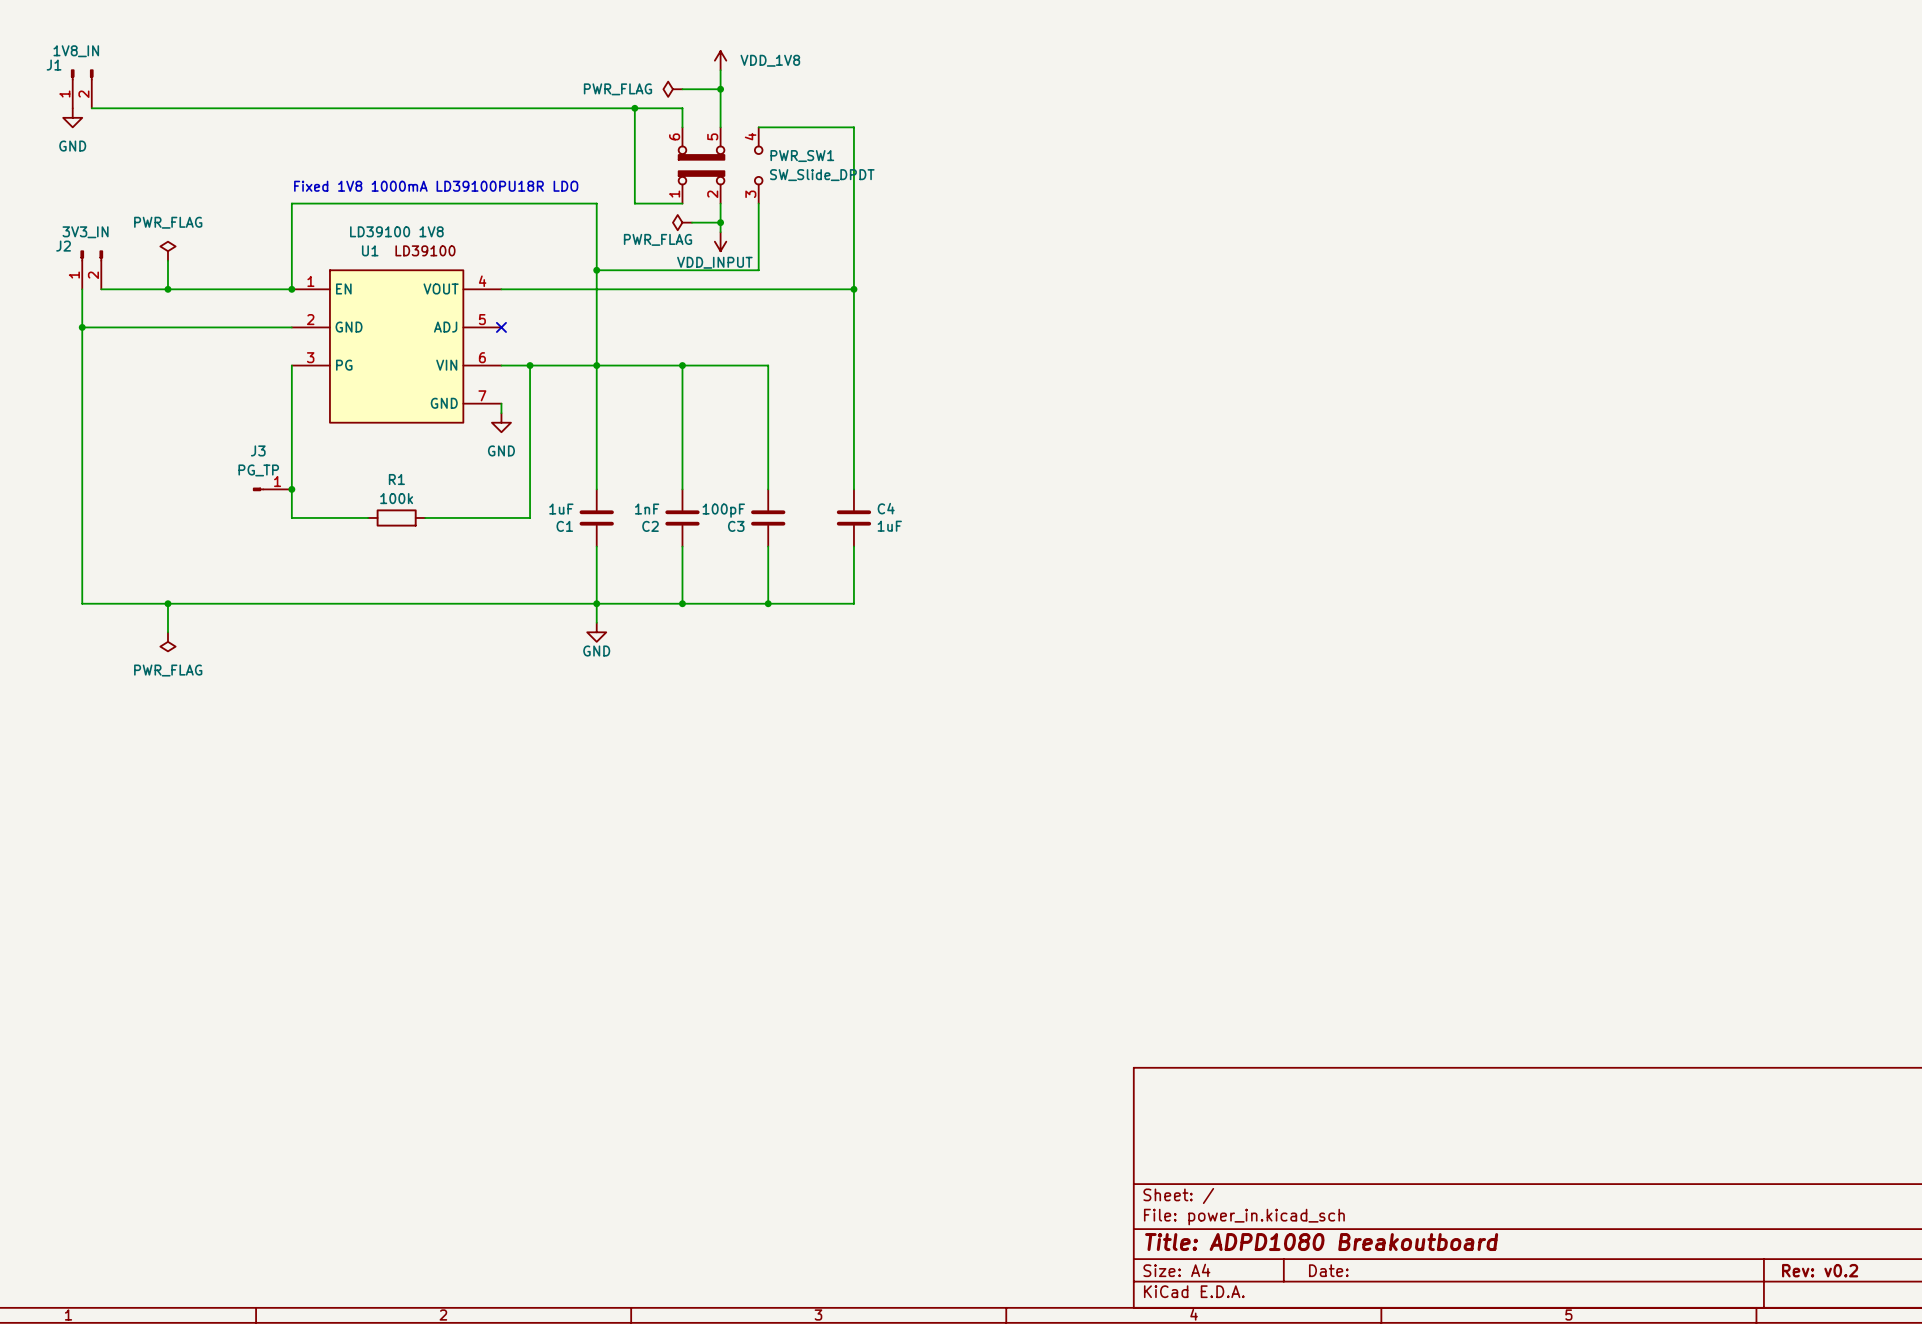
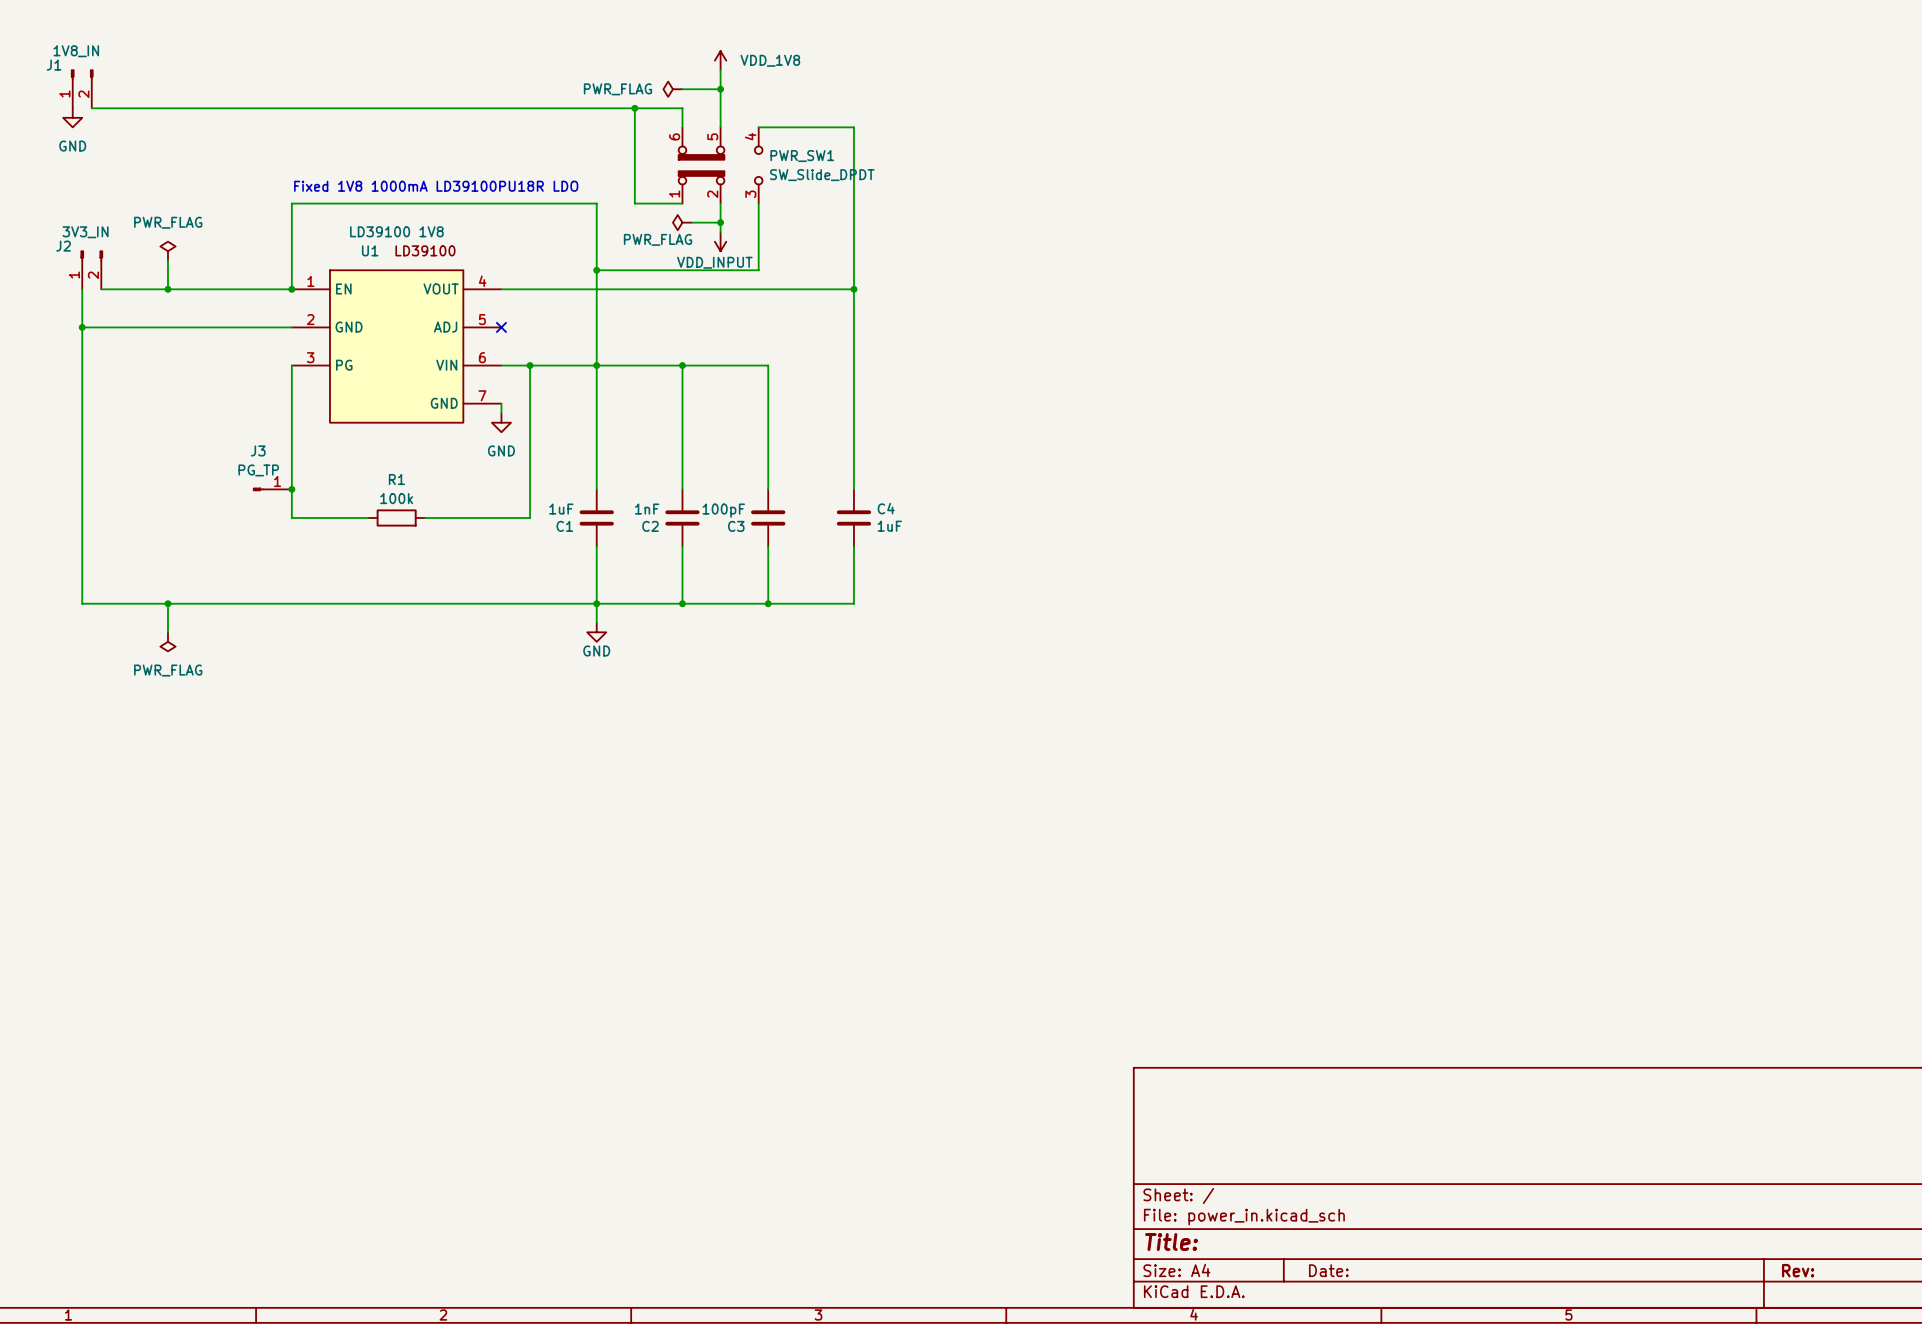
title block: Title: ADPD1080 Breakoutboard (1321, 1242) -> Title: (1171, 1242)
title block: Rev: v0.2 (1820, 1270) -> Rev: (1798, 1270)

